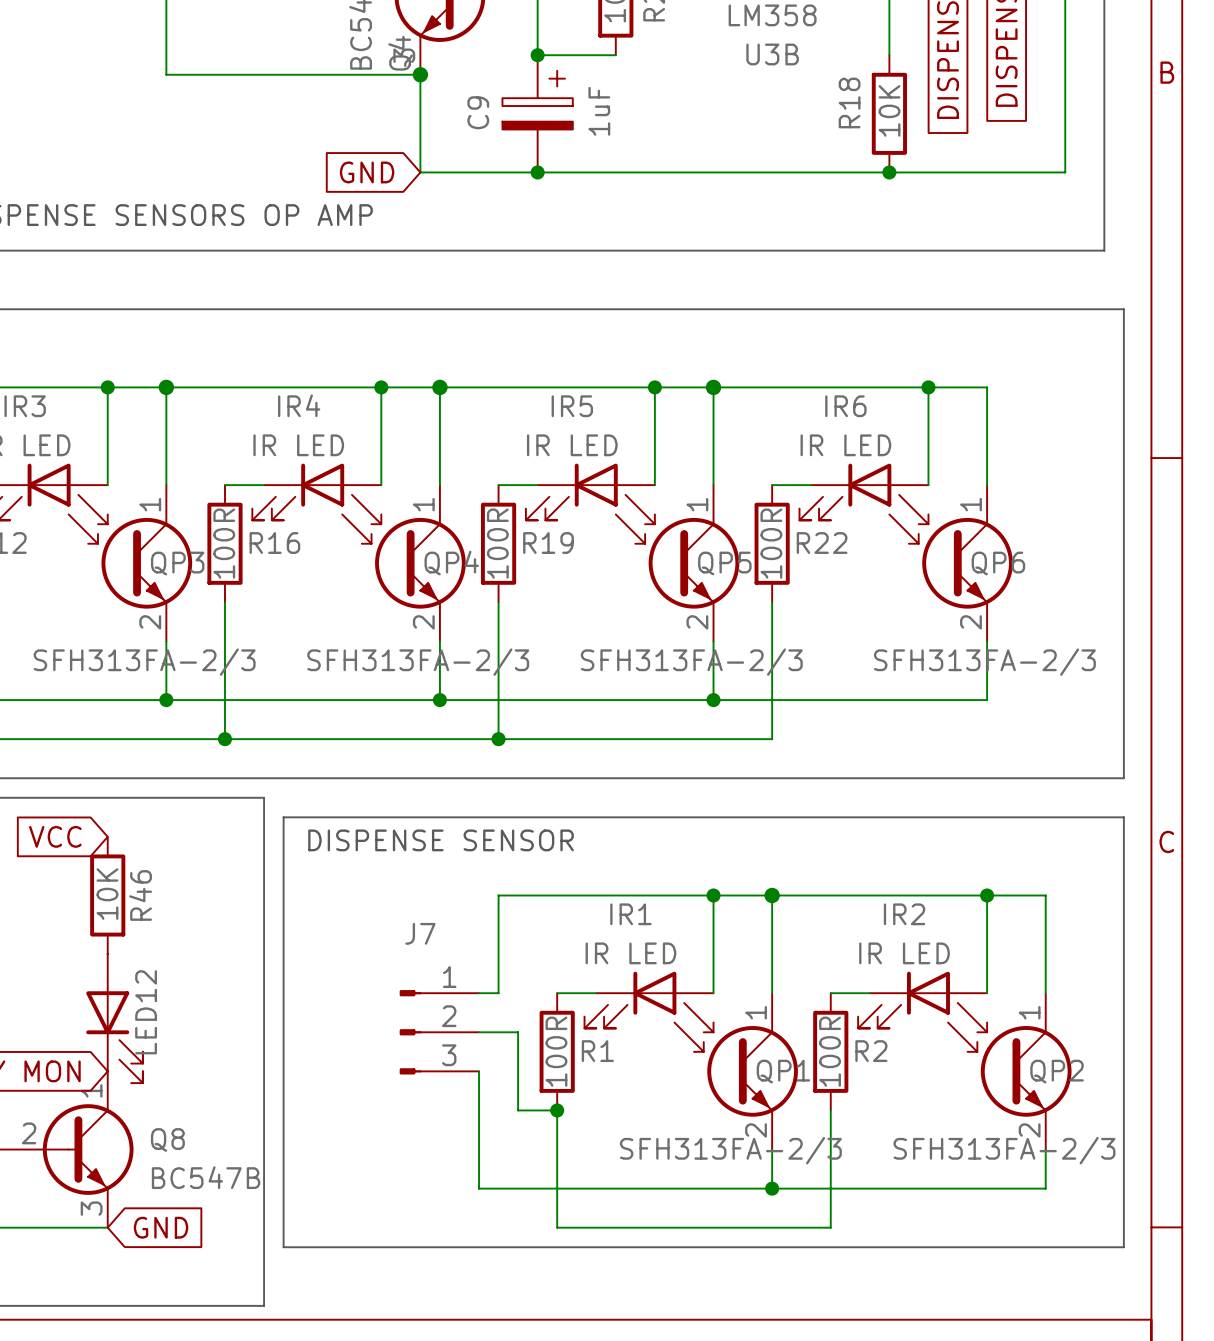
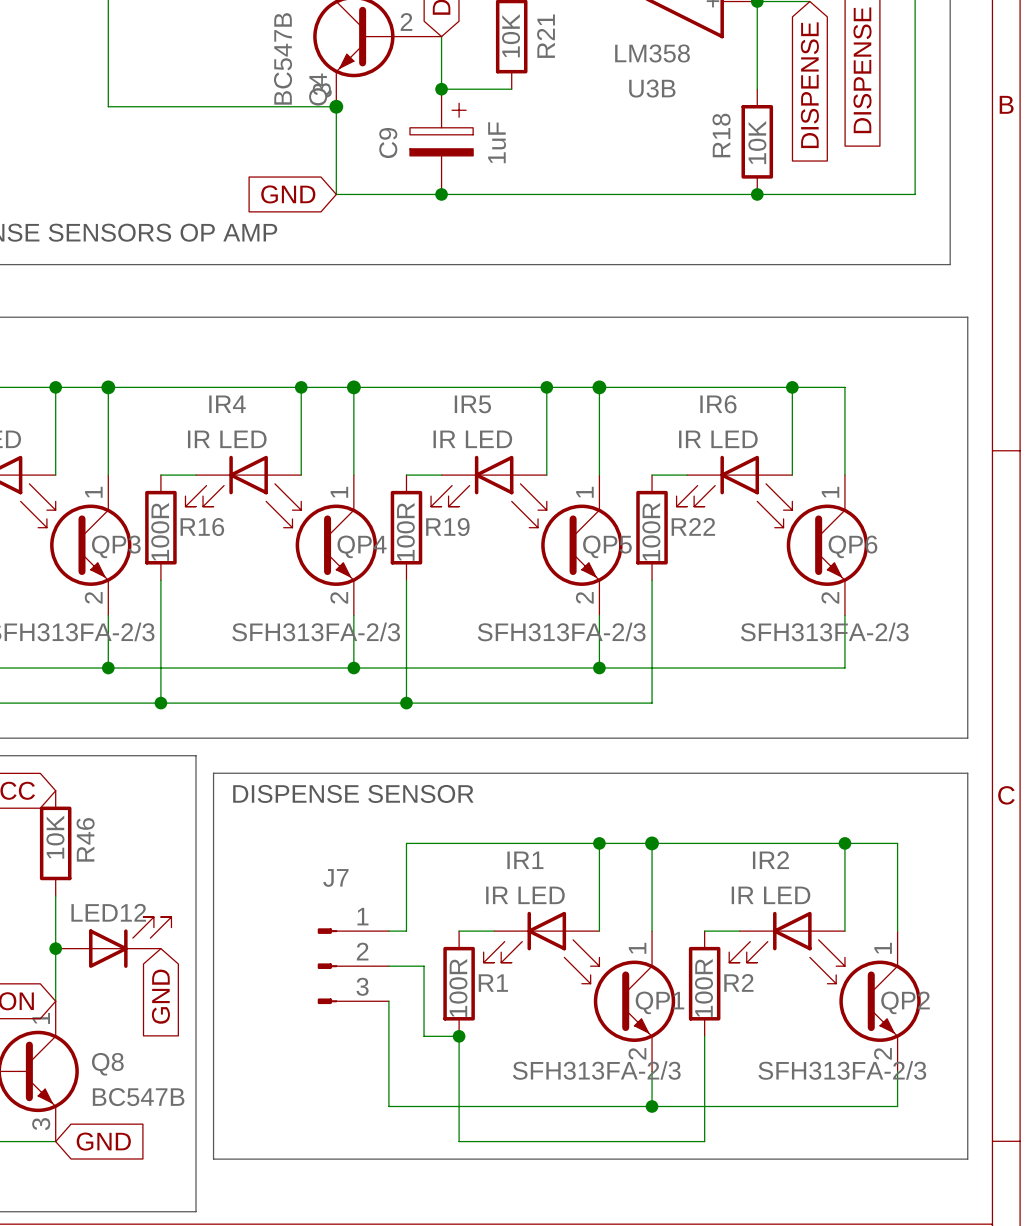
junction: none -> (55, 948)
LED12 rotation: 0° (114, 1037) -> 90° counterclockwise (130, 942)
global label: none -> GND (160, 996)

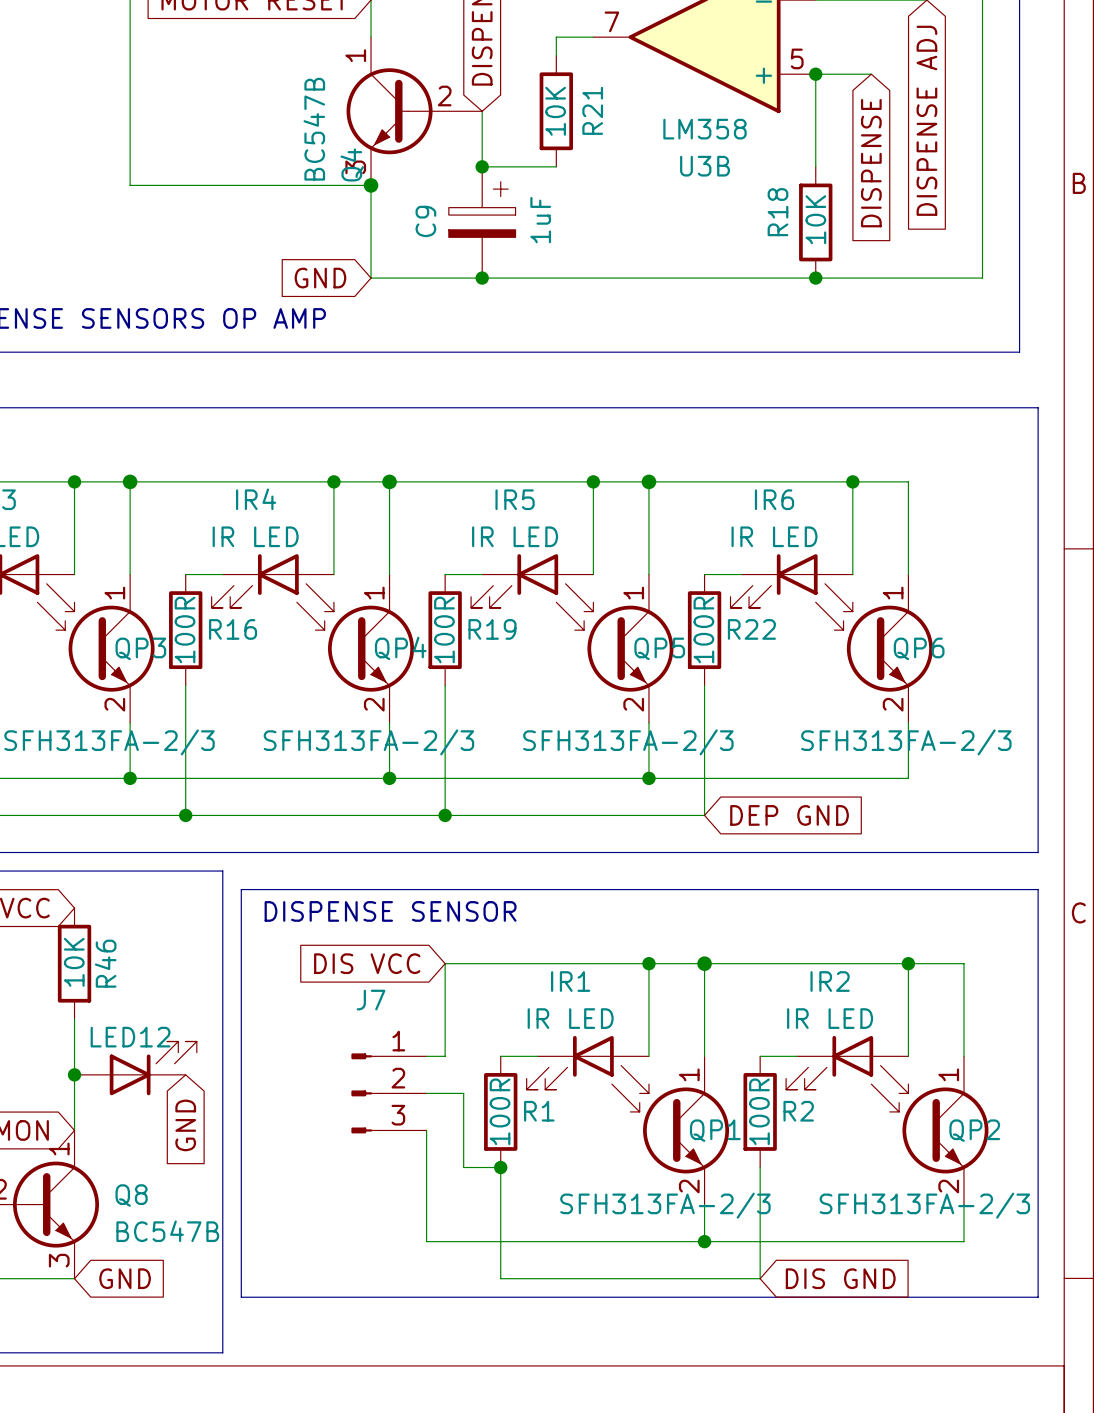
global label: none -> DEP GND (789, 815)
global label: none -> DIS VCC (367, 963)
global label: none -> DIS GND (840, 1278)

